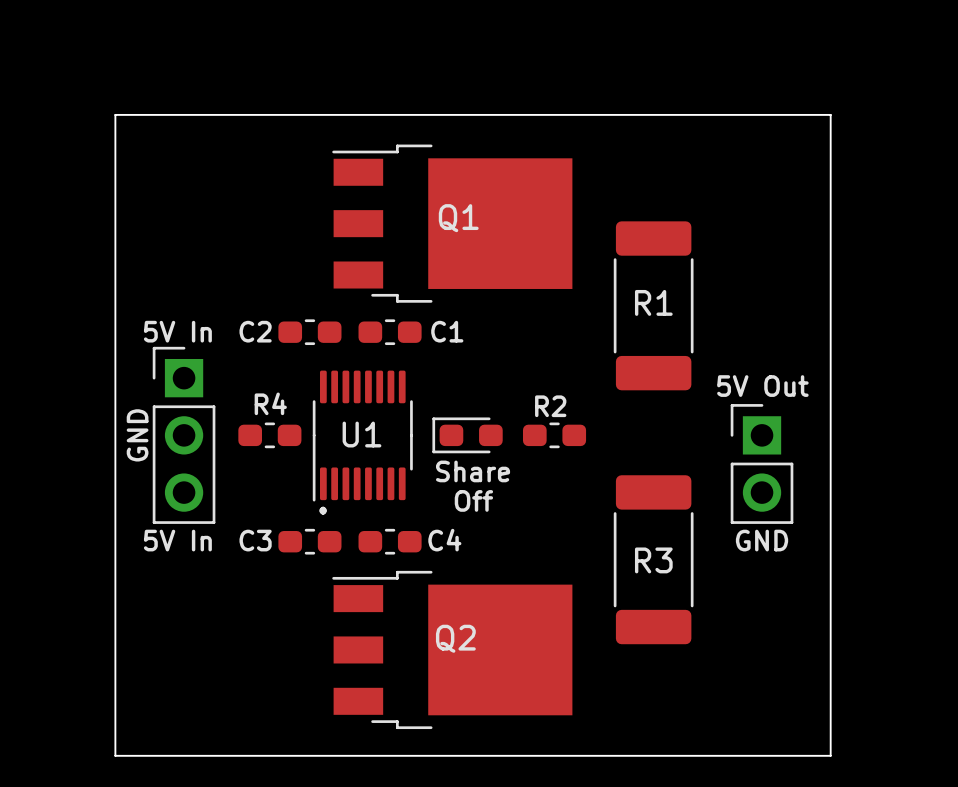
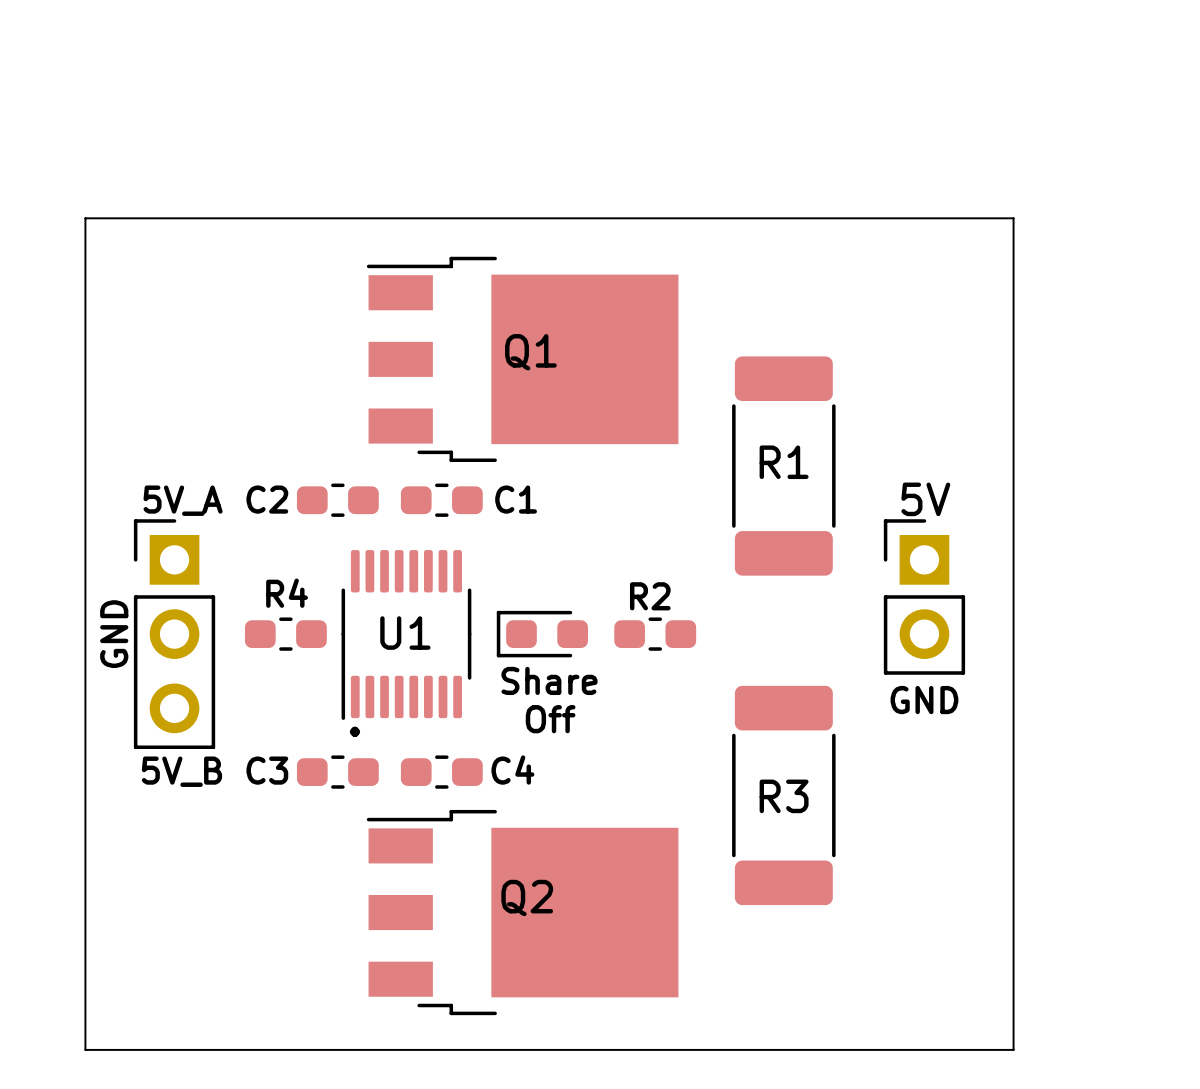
text: 5V In (177, 331) -> 5V_A (183, 500)
text: none -> 5V (925, 499)
text: 5V Out (762, 386) -> none
part position: (762, 463) -> (924, 596)
text: 5V In (177, 540) -> 5V_B (181, 771)
text position: GND (762, 540) -> GND (924, 700)

